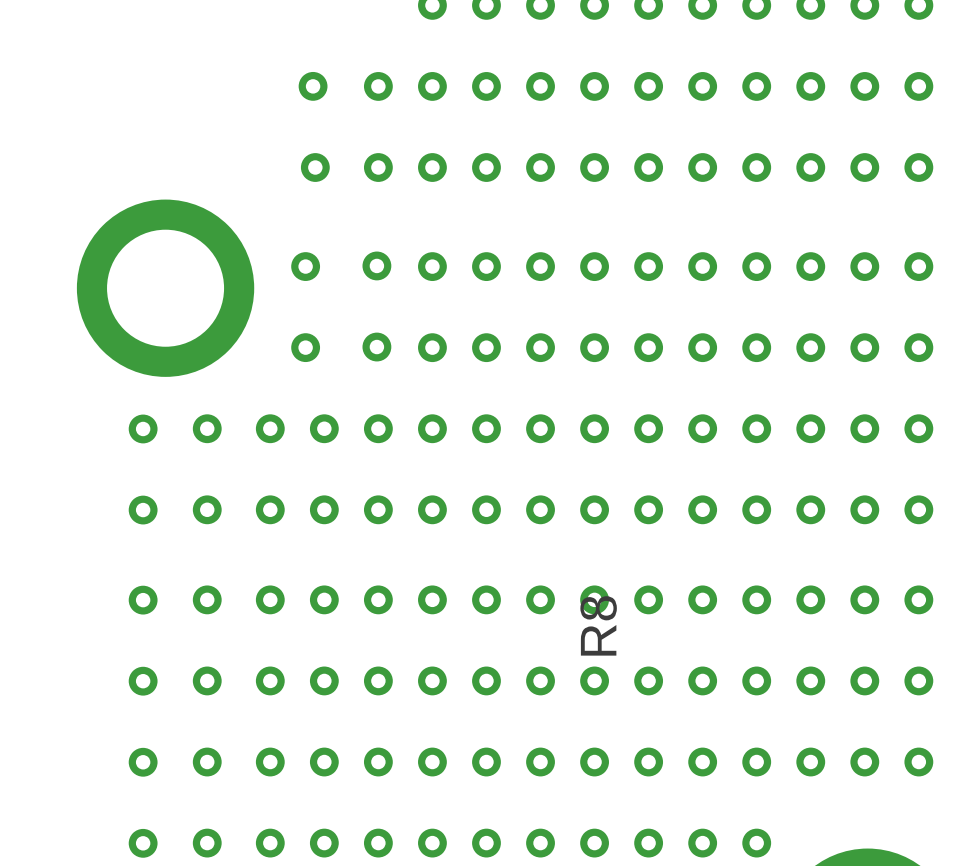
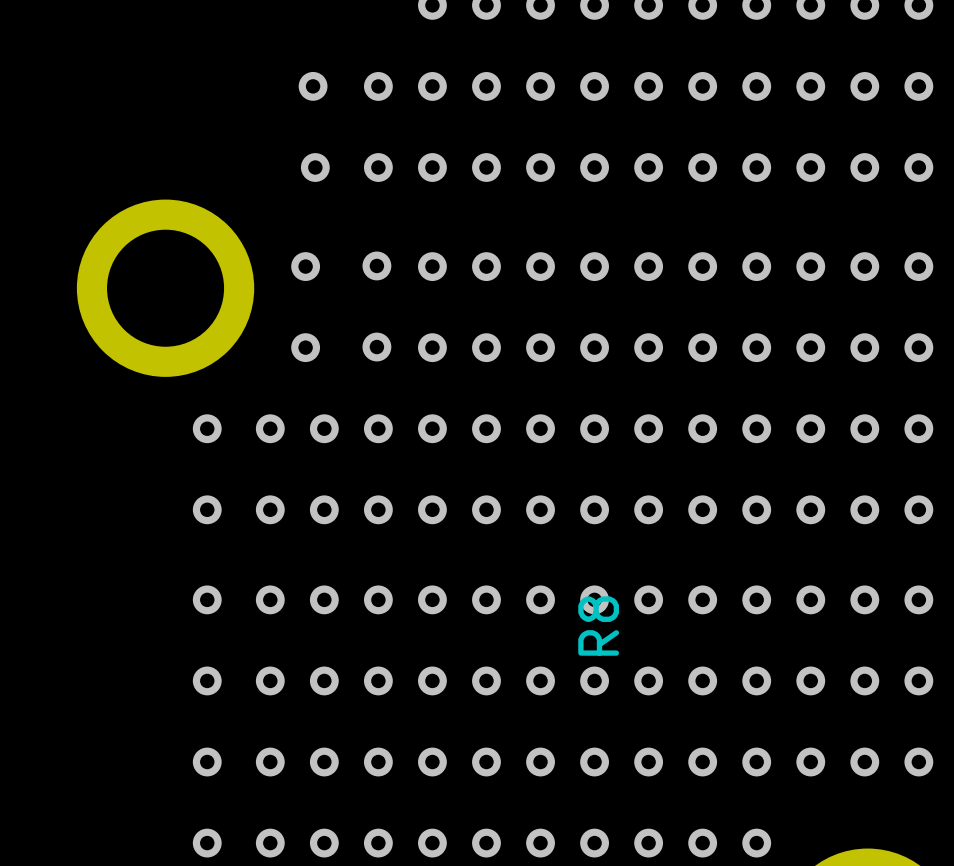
via: (143, 428) -> none
via: (143, 510) -> none
via: (143, 600) -> none
via: (143, 681) -> none
via: (143, 762) -> none
via: (143, 843) -> none

